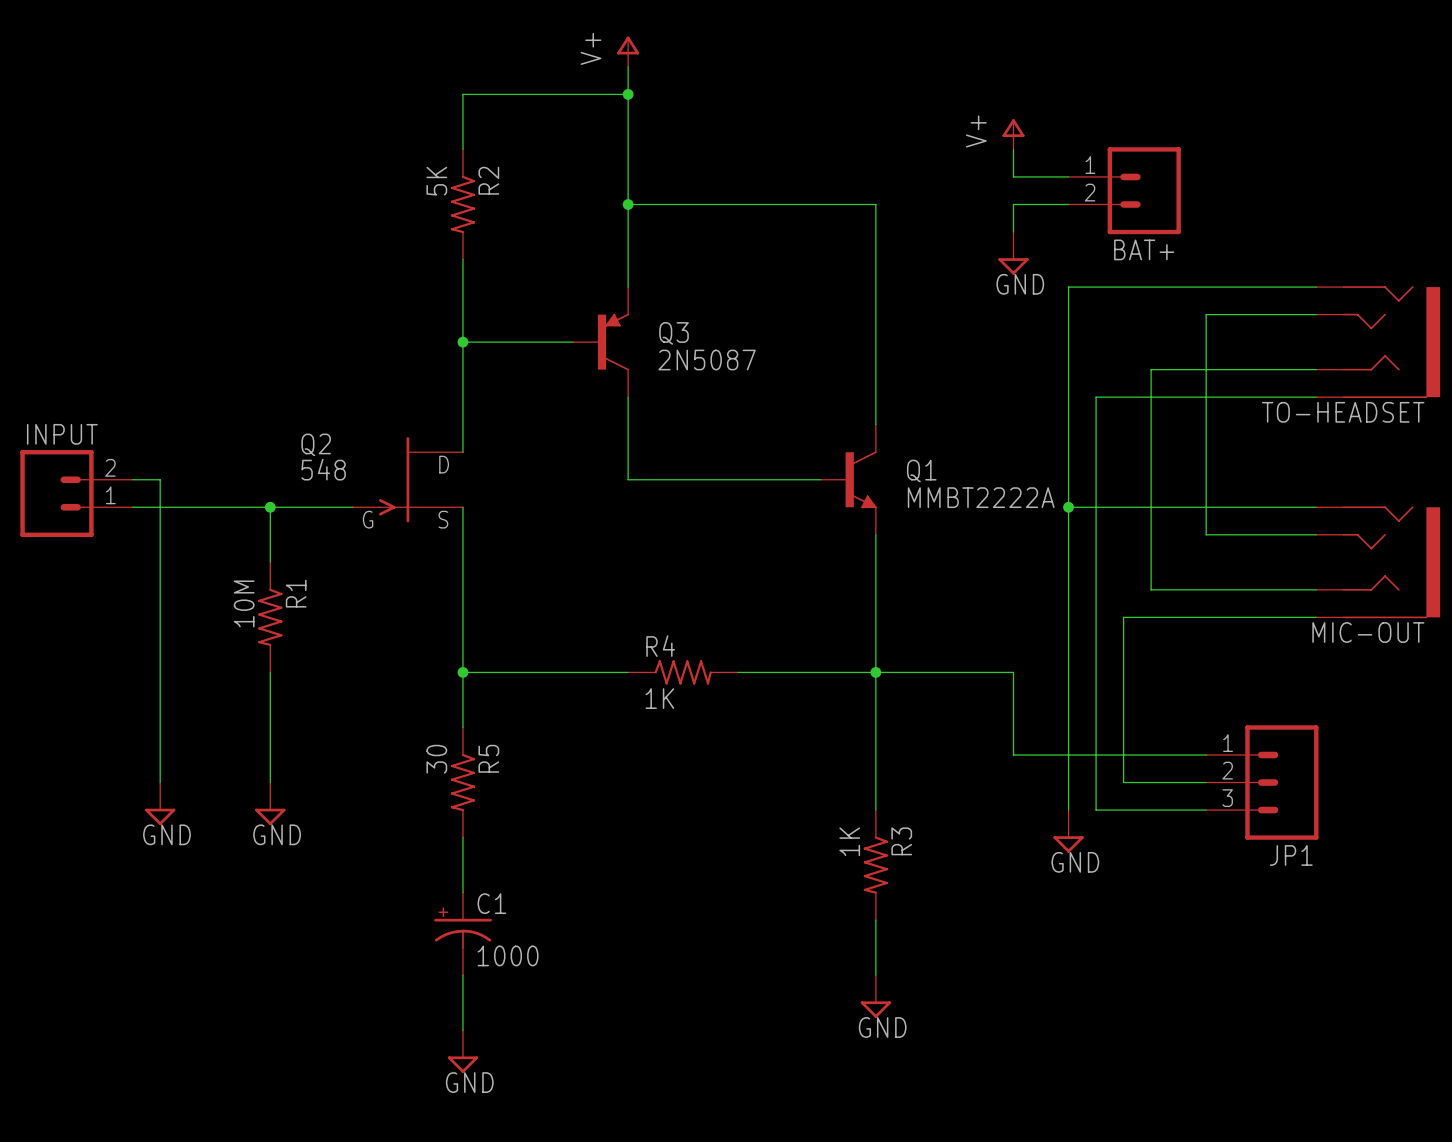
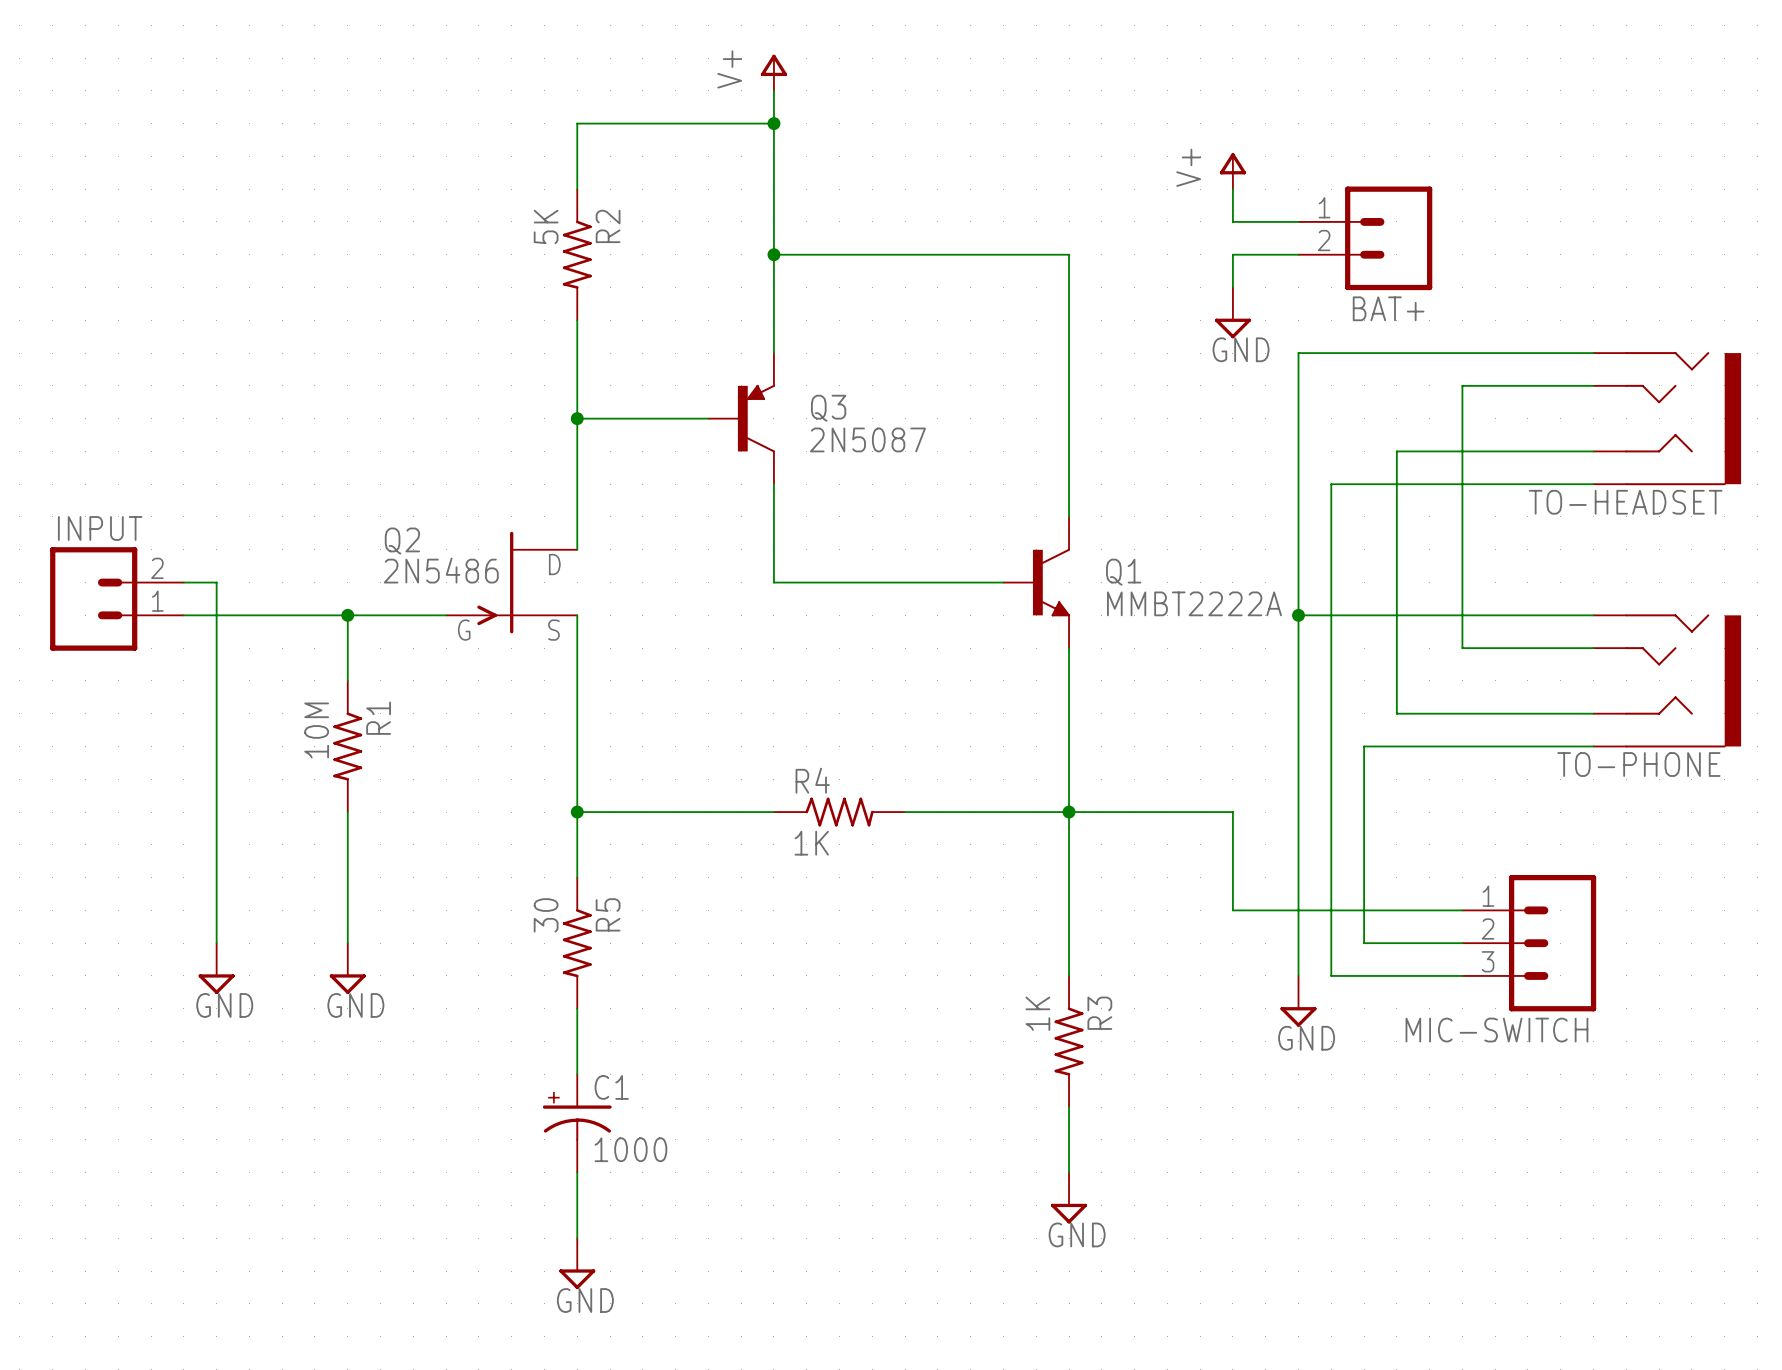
Q2 value: 548 (323, 469) -> 2N5486 (441, 570)
MIC-OUT name: MIC-OUT (1368, 632) -> TO-PHONE (1638, 764)
JP1 name: JP1 (1291, 855) -> MIC-SWITCH (1496, 1030)

